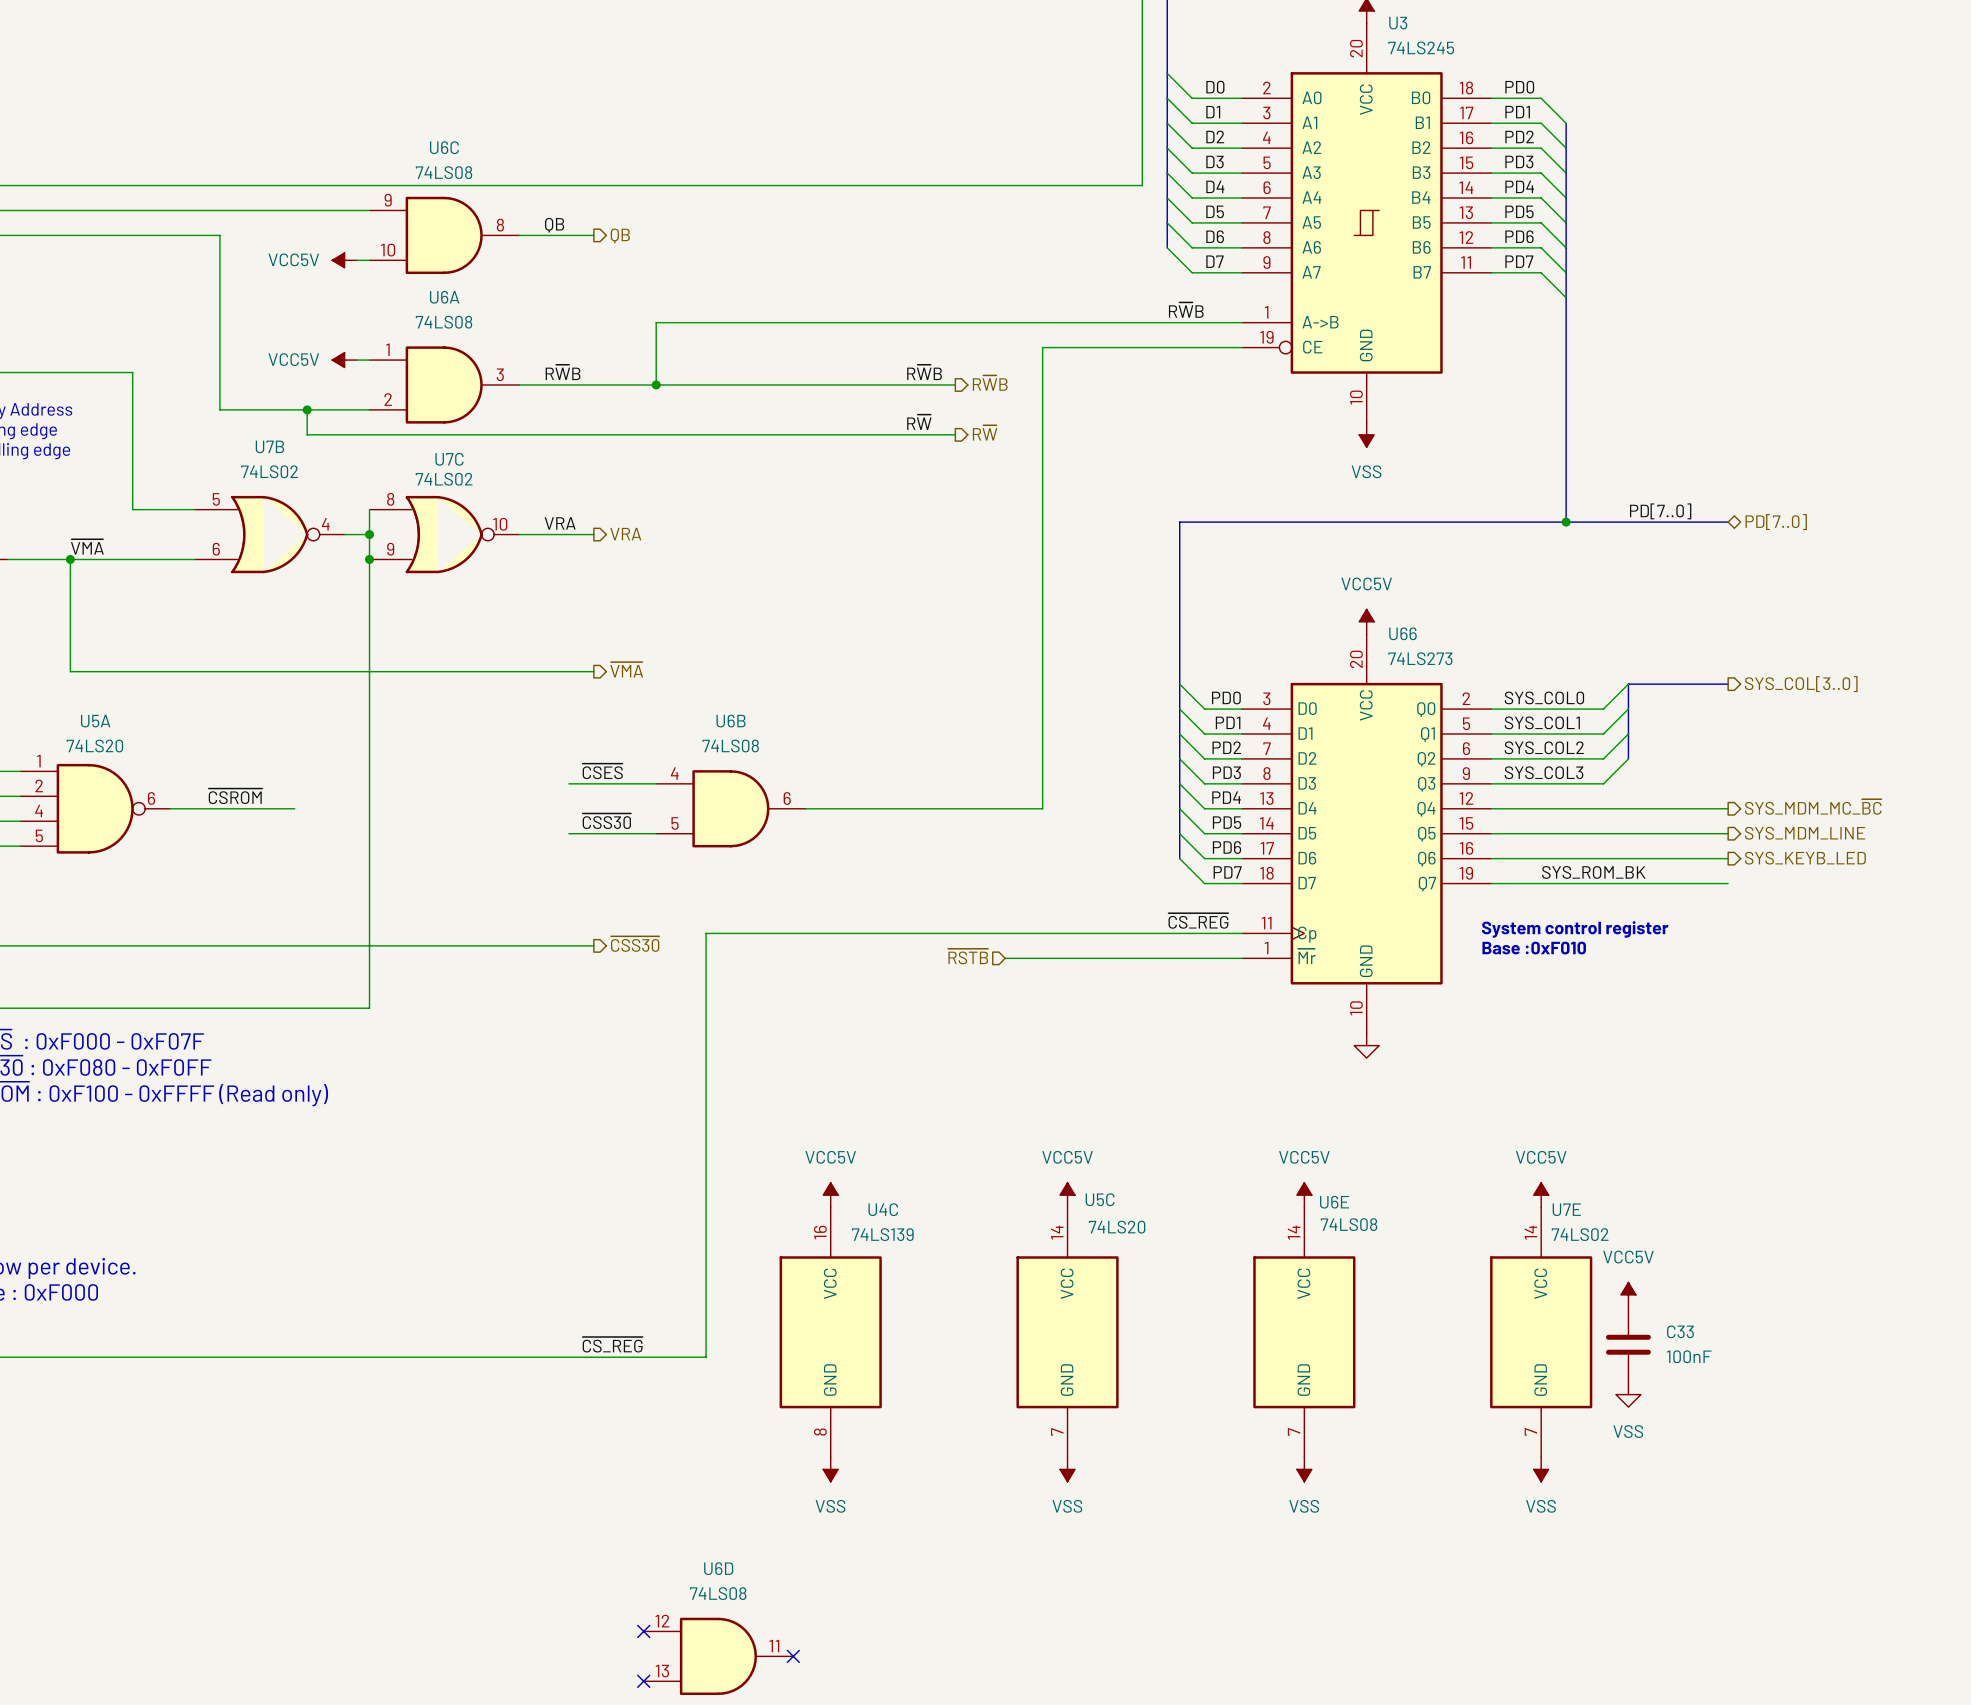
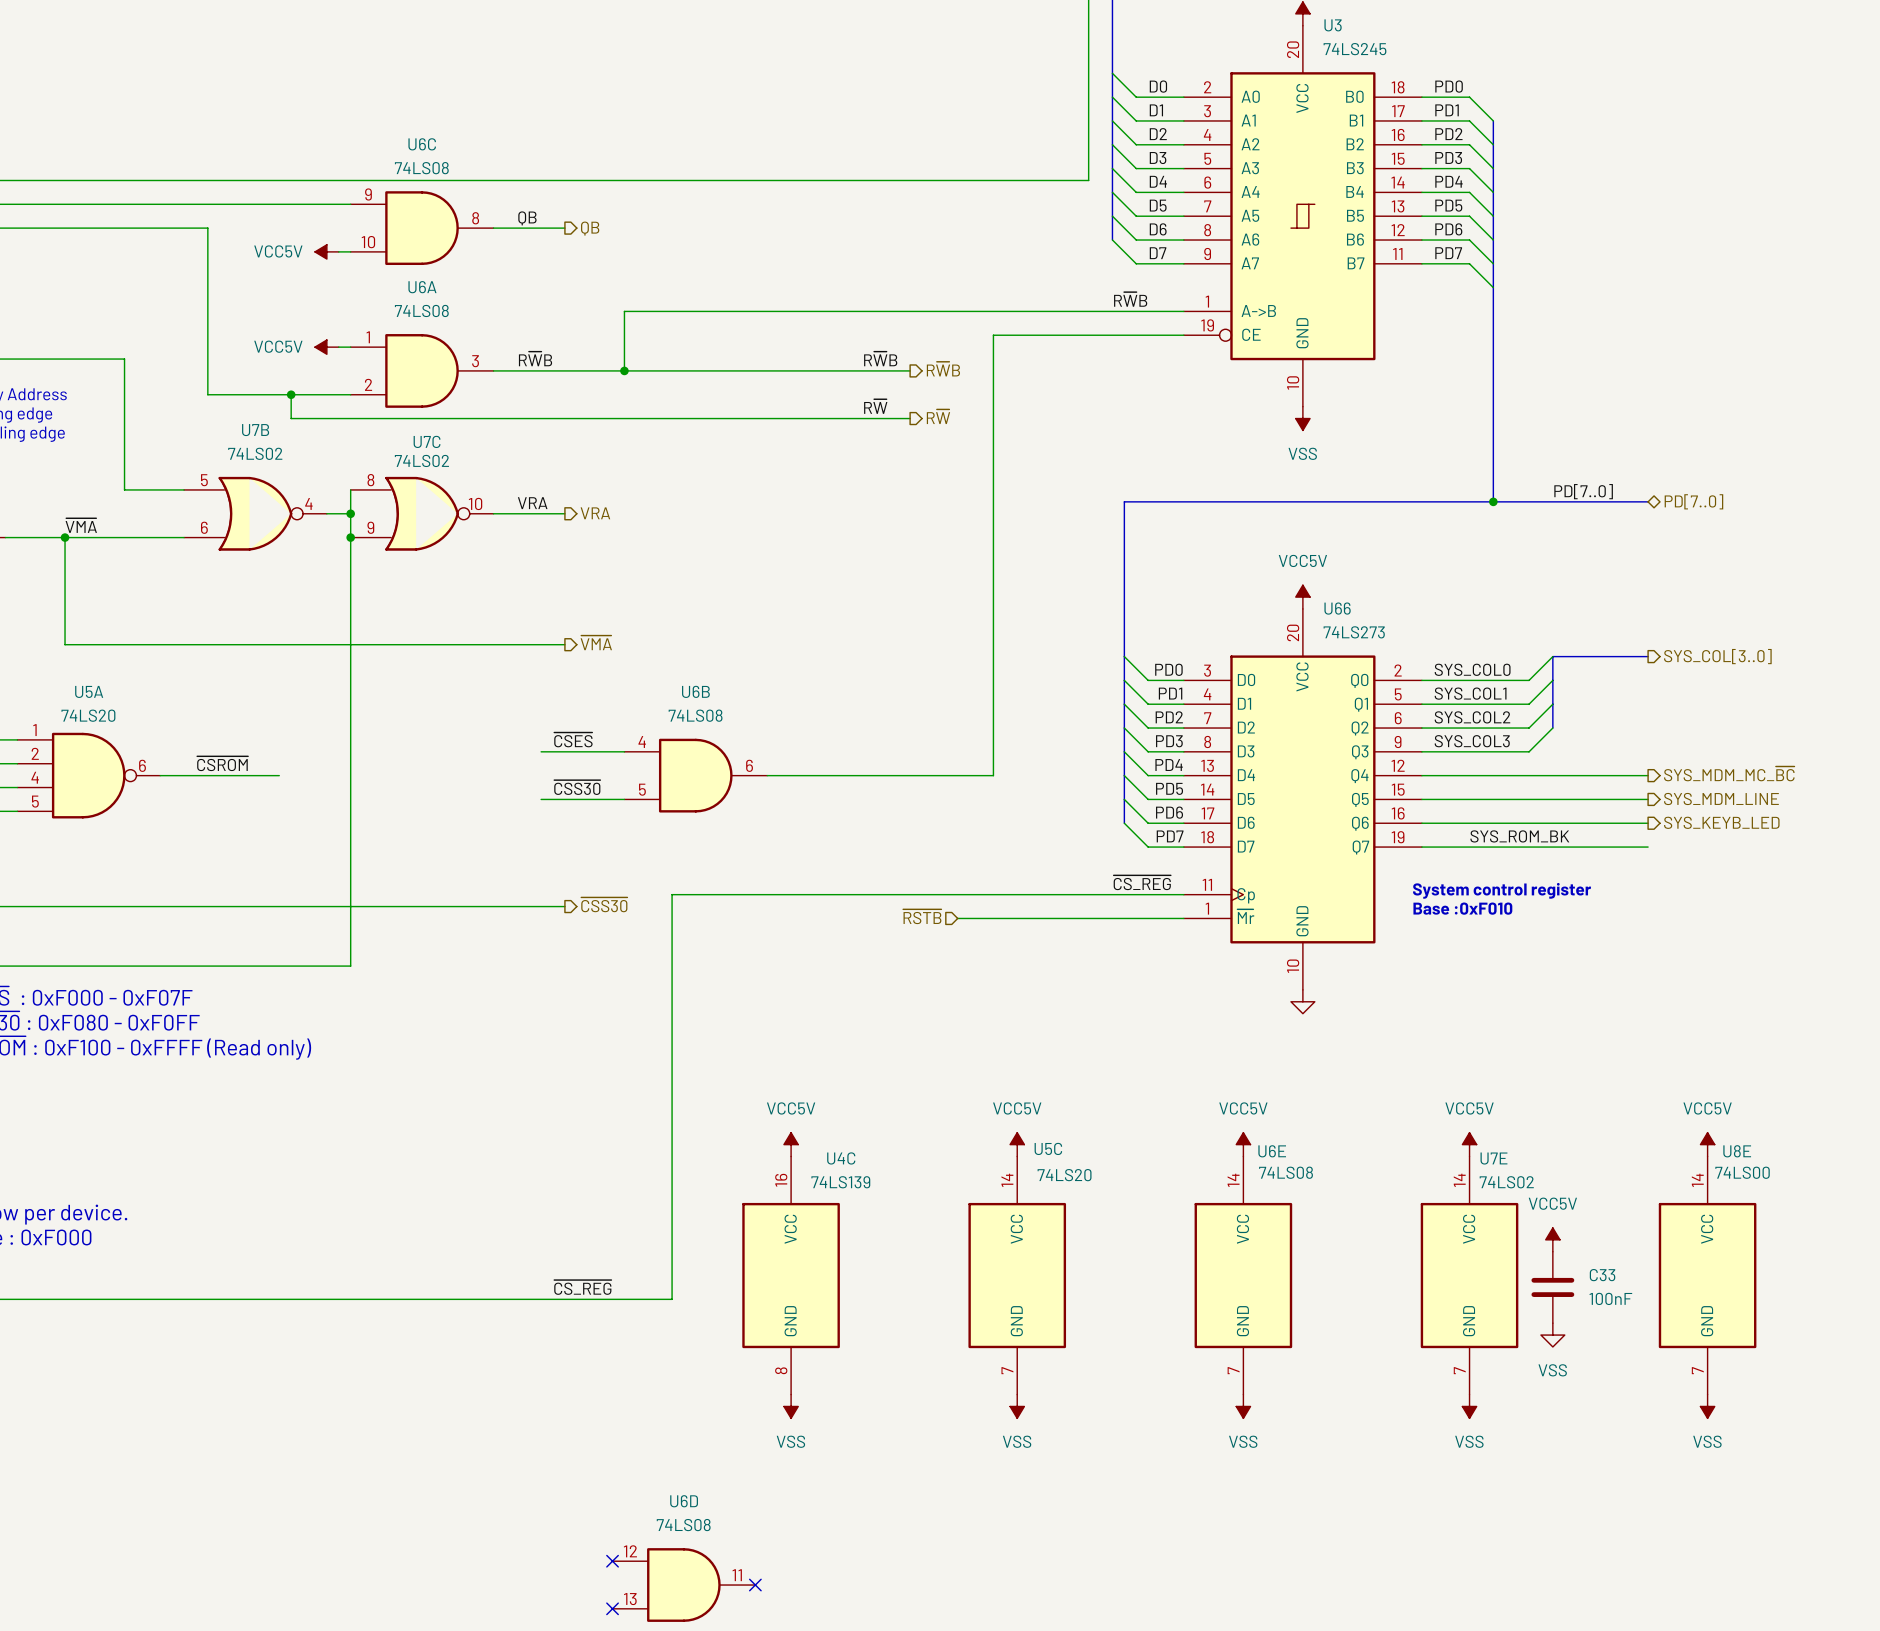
power symbol: none -> VCC5V (1707, 1144)
U8E: none -> 74LS00 (1707, 1275)
power symbol: none -> VSS (1707, 1406)

